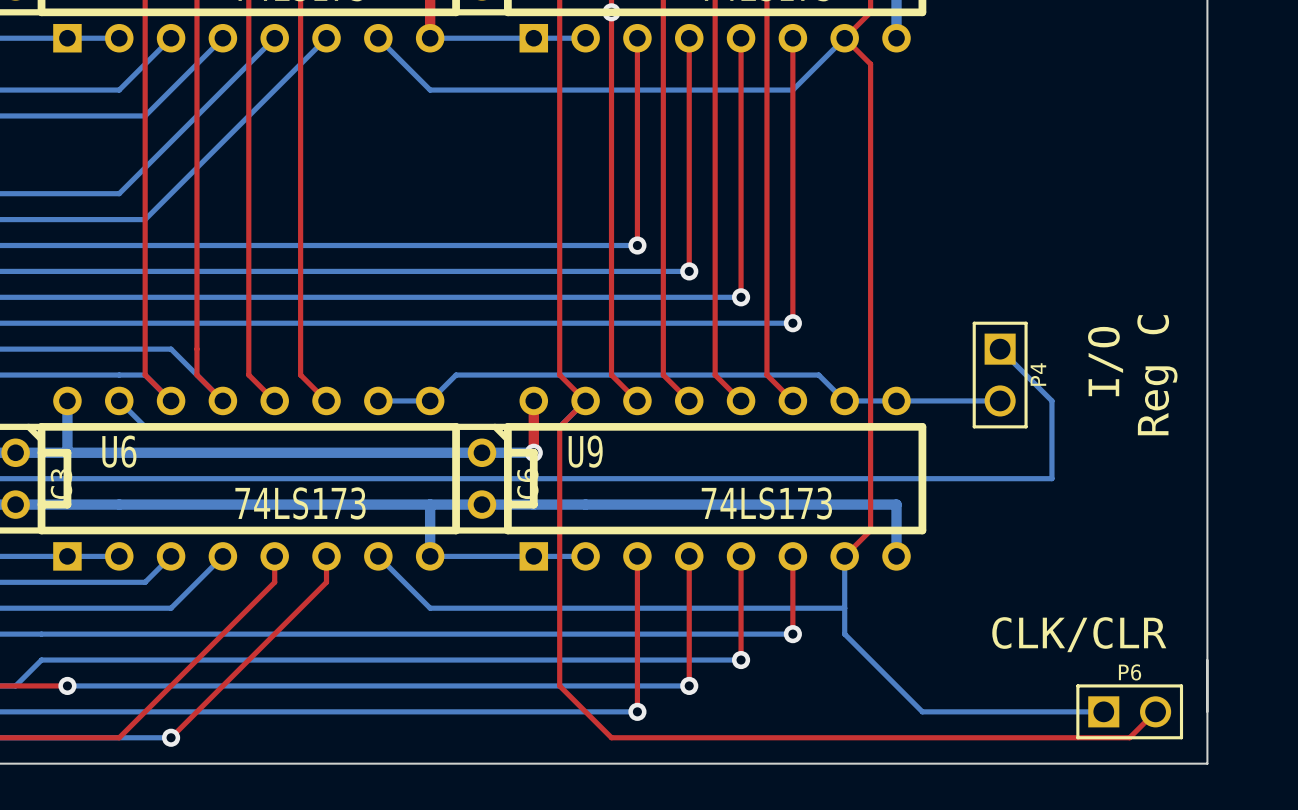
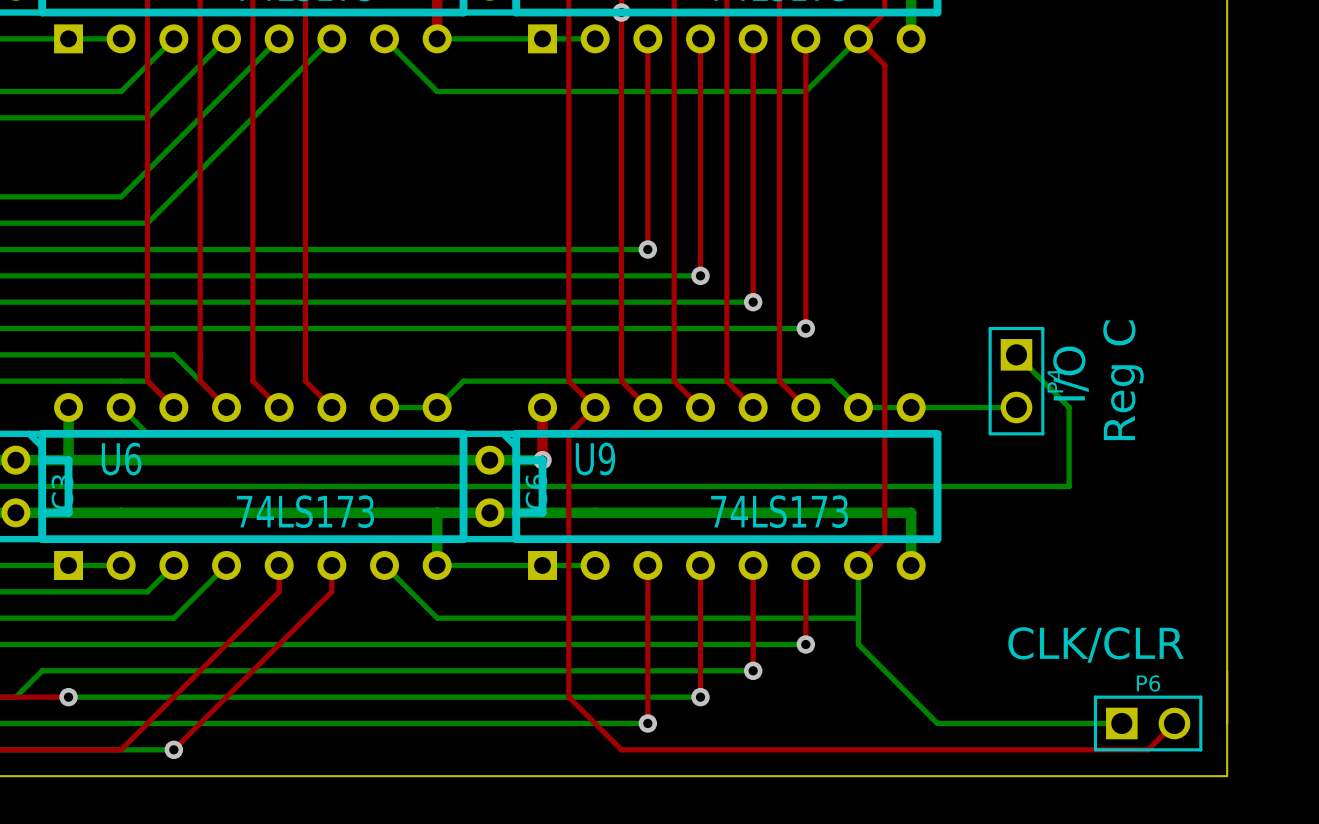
text: none -> I/O (1070, 373)
text: I/O (1105, 361) -> Reg C (1123, 380)
text: Reg C (1157, 375) -> none

